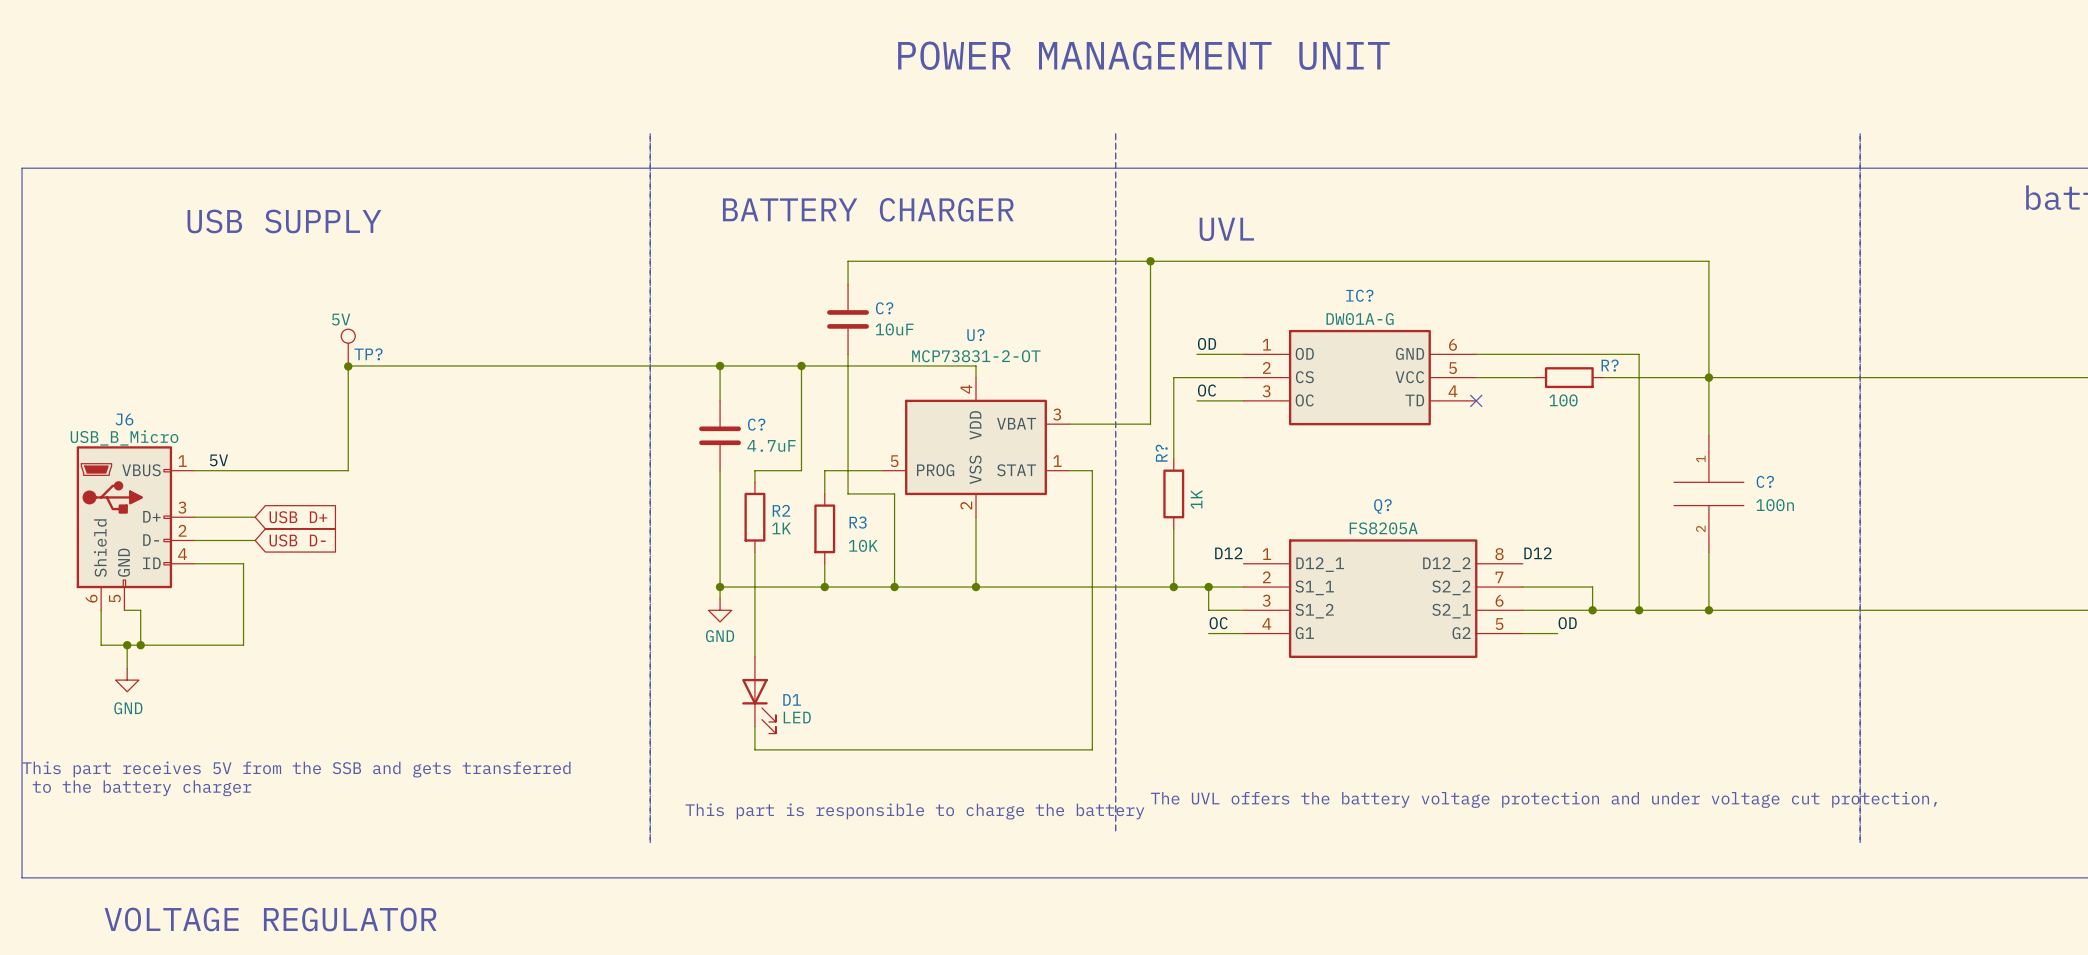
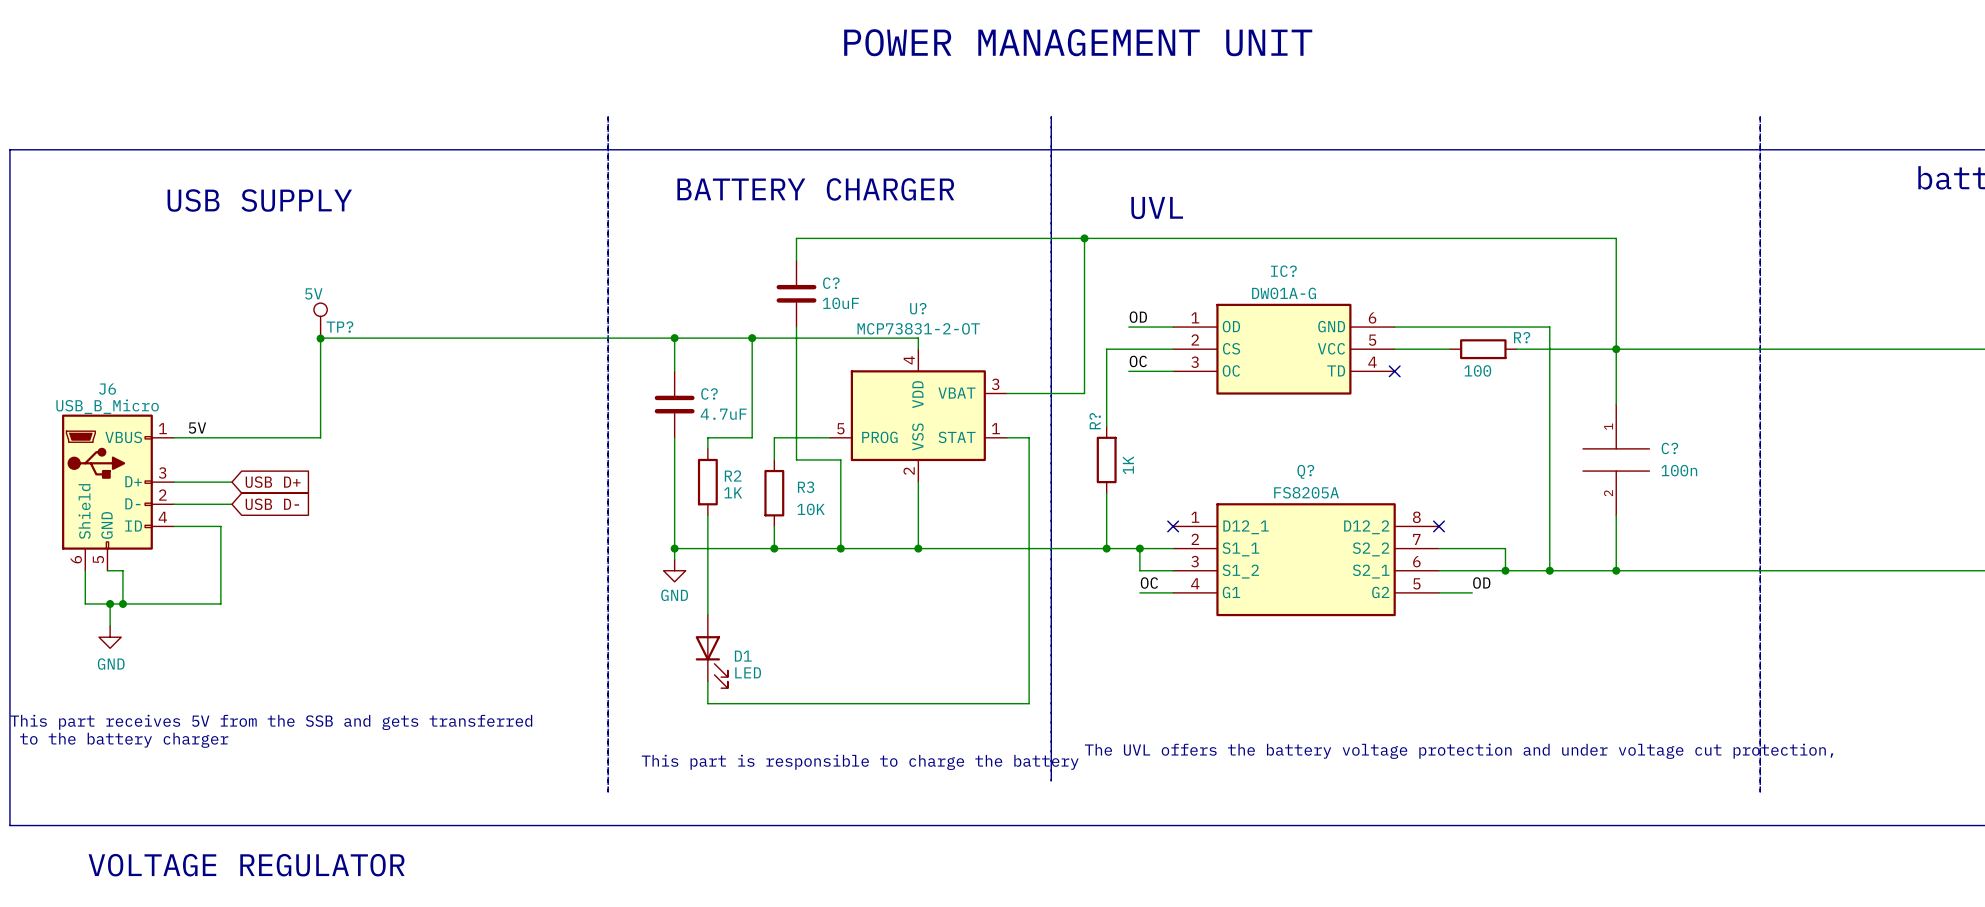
label: D12 (1228, 553) -> none
label: D12 (1538, 553) -> none
no-connect mark: none -> (1173, 526)
no-connect mark: none -> (1439, 526)

